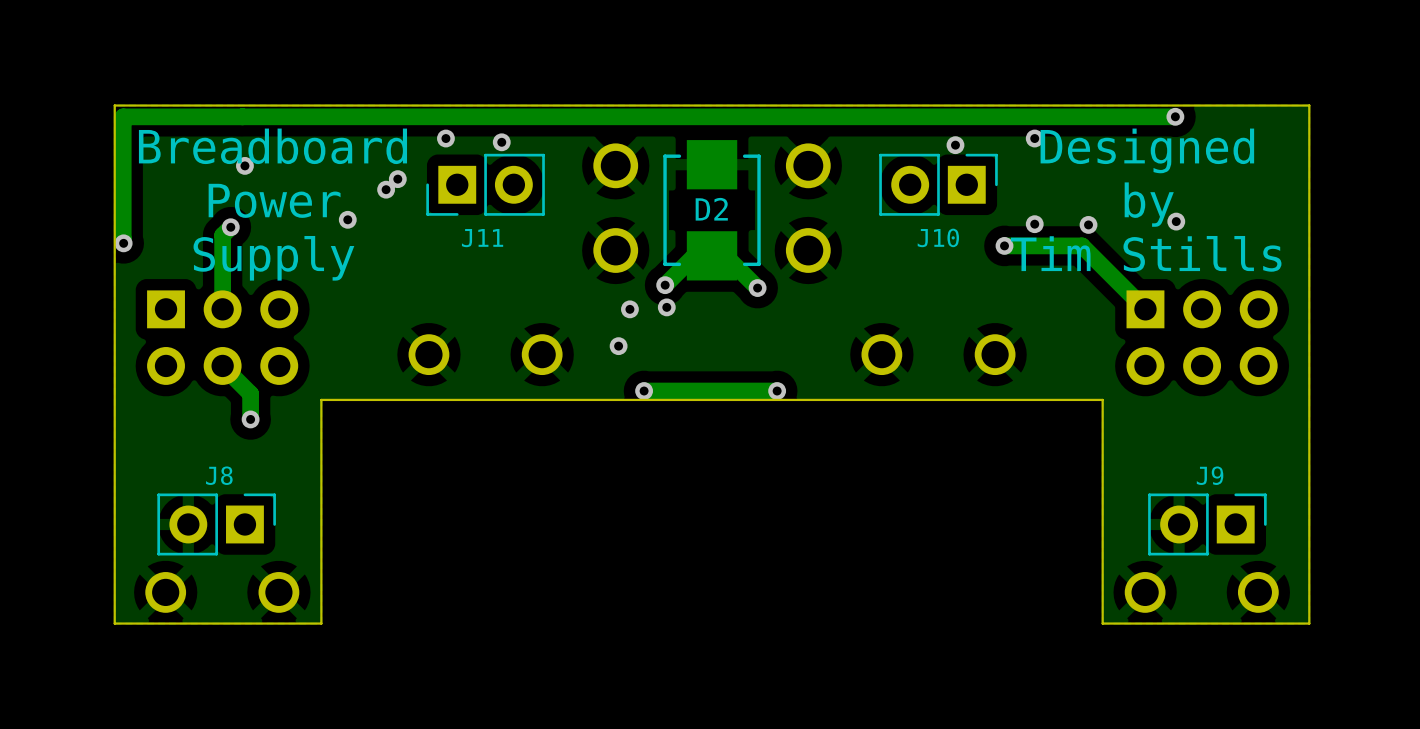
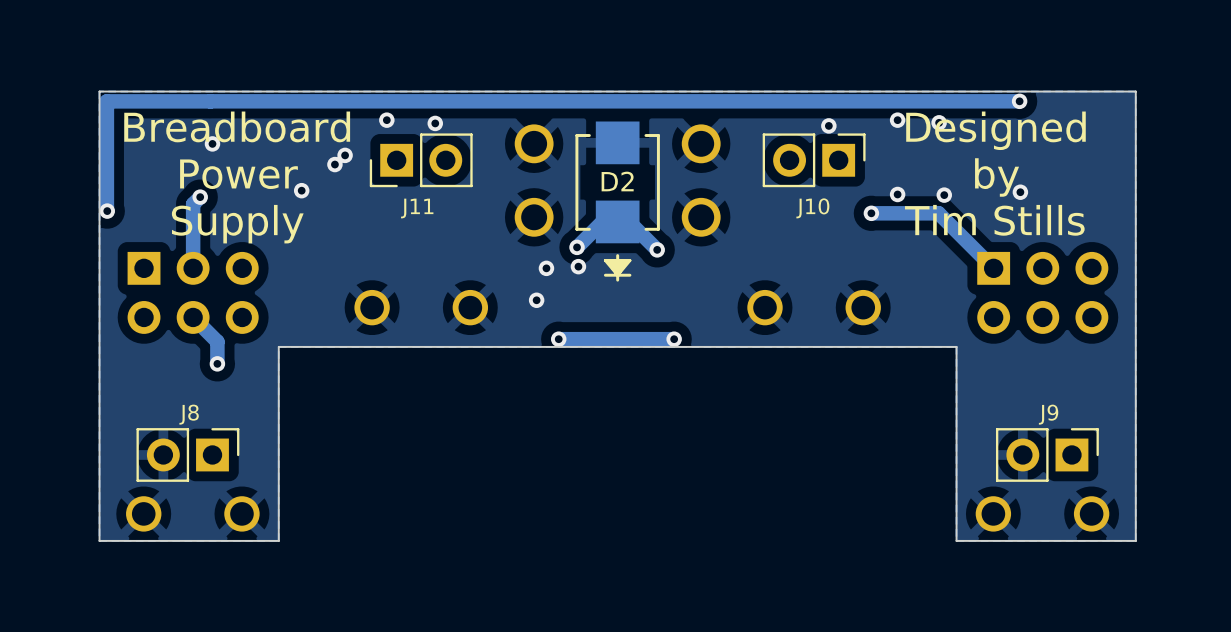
D2 footprint: [663, 140, 761, 281] -> [575, 121, 660, 282]
via: none -> (939, 122)

